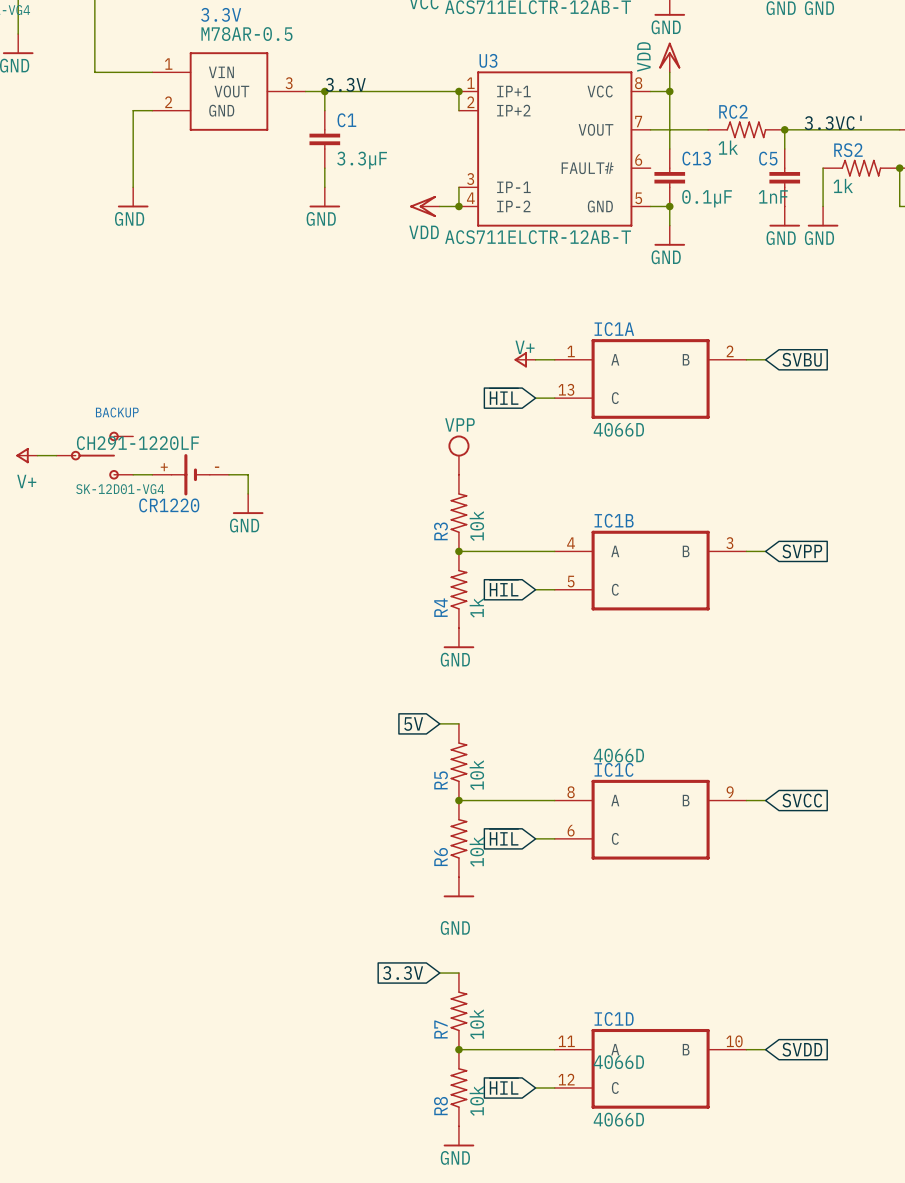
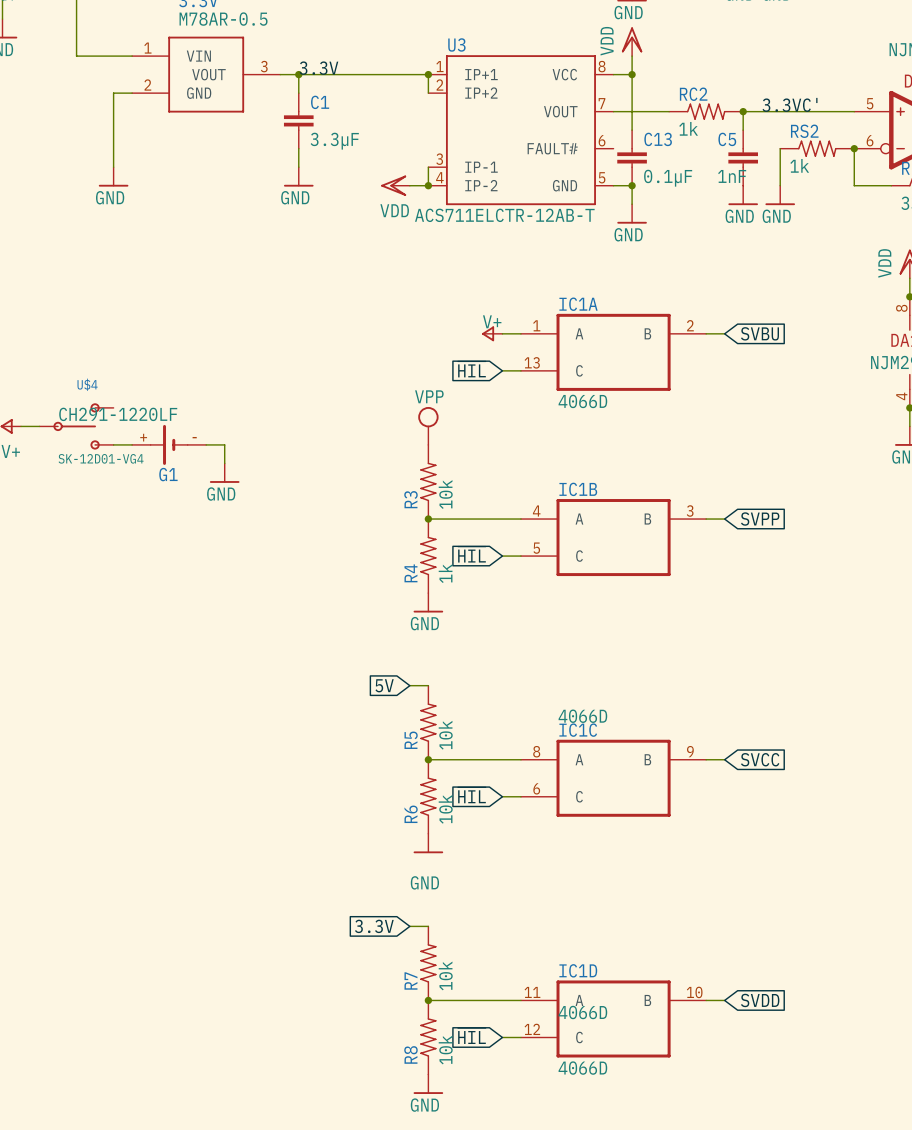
BACKUP name: BACKUP (117, 412) -> U$4 (87, 384)
CR1220 name: CR1220 (169, 505) -> G1 (168, 474)

